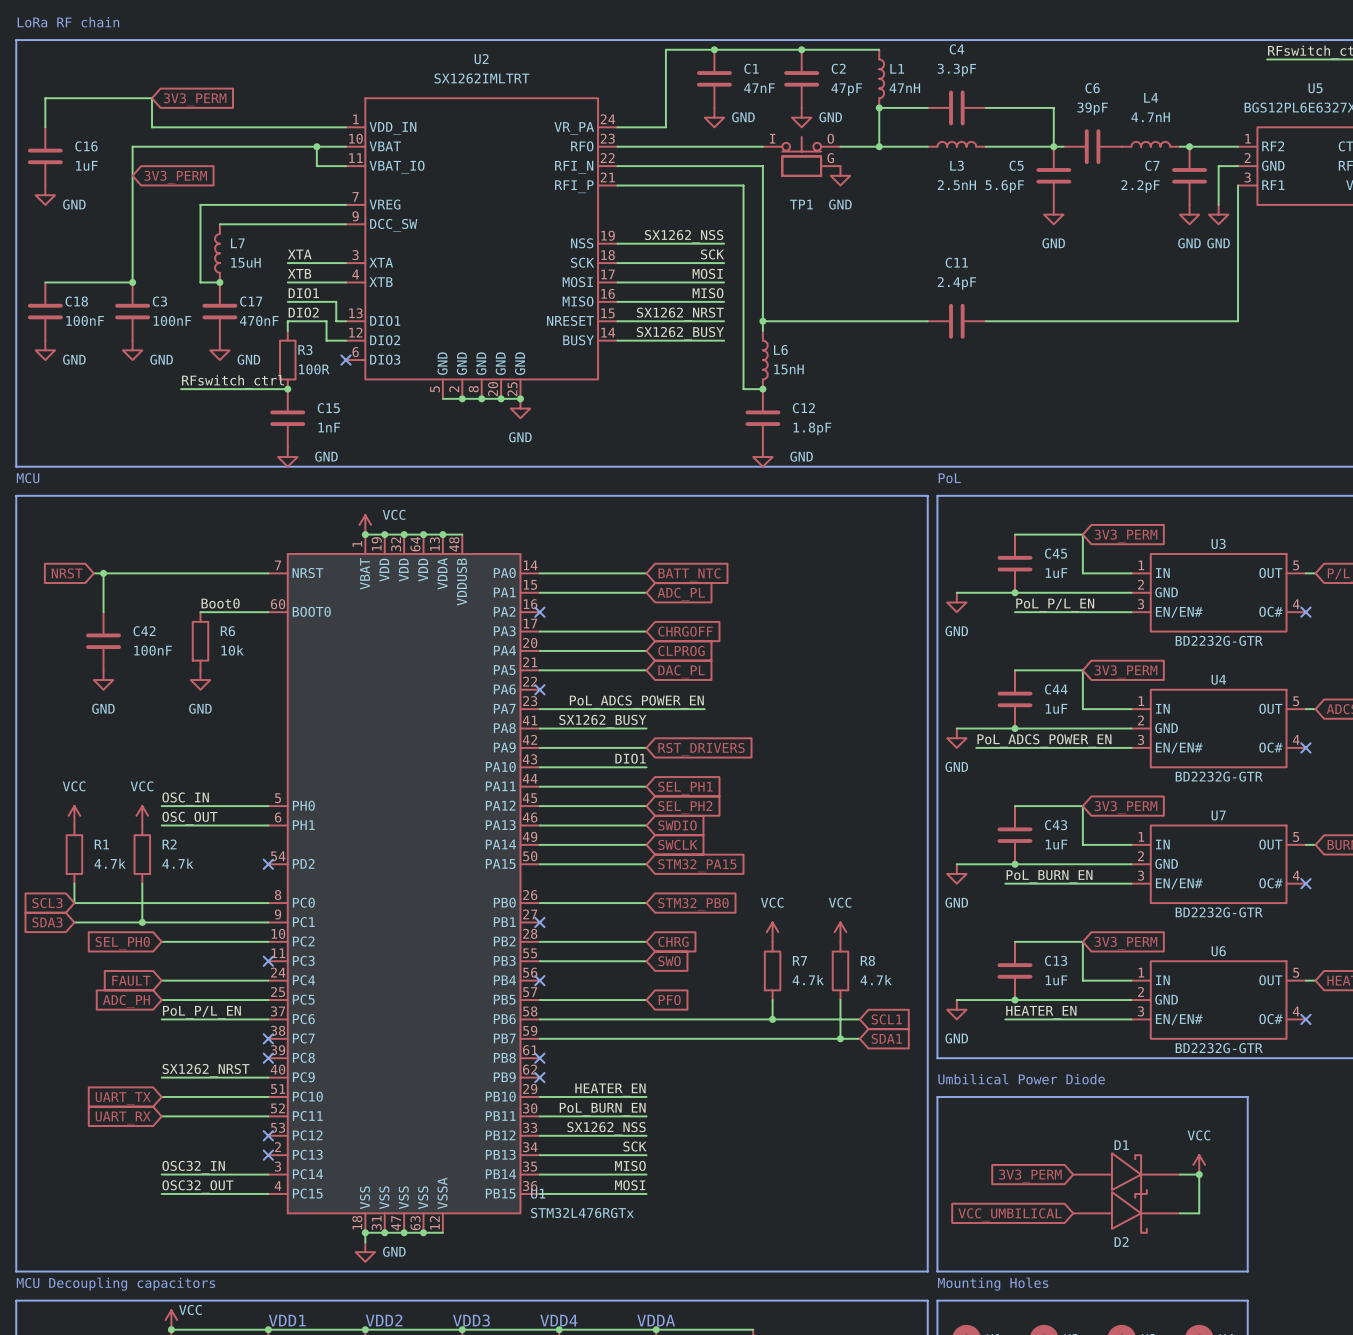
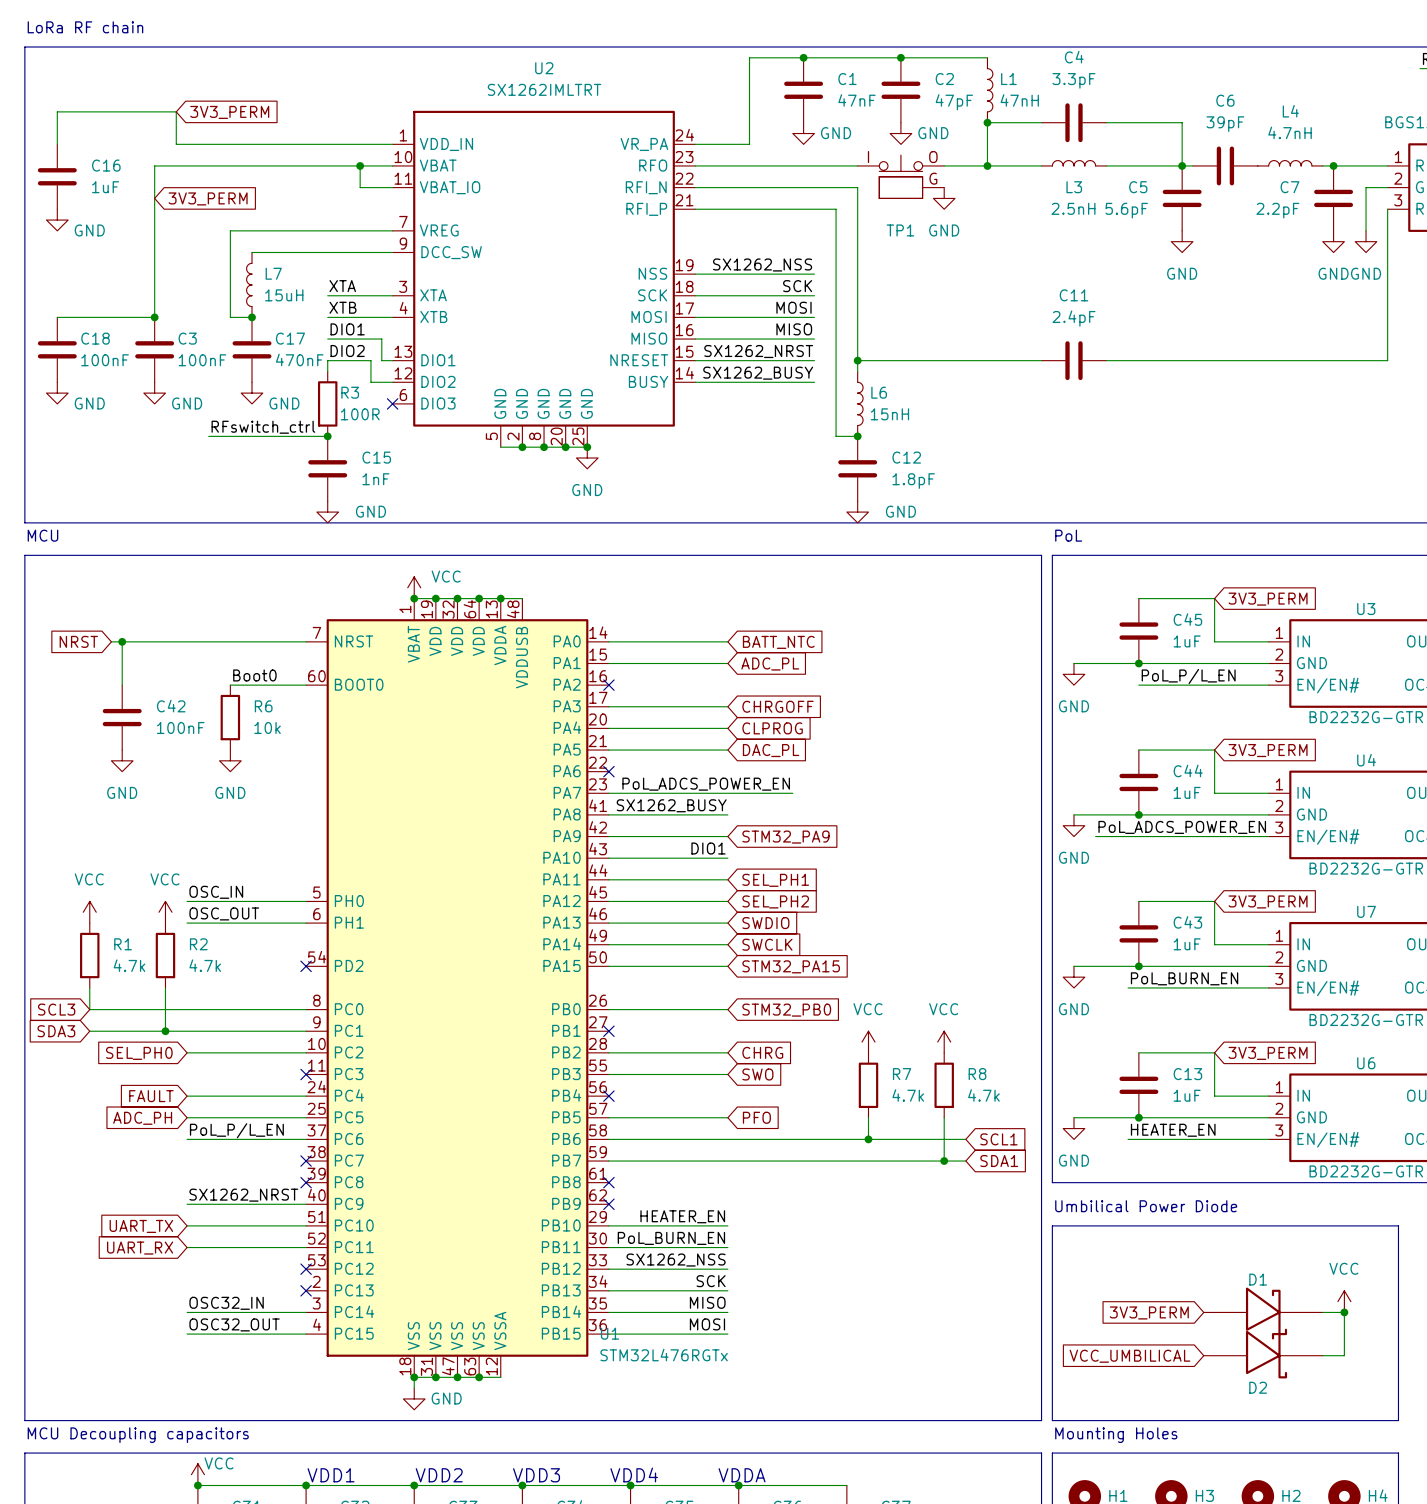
global label: RST_DRIVERS (701, 749) -> STM32_PA9 (785, 837)

